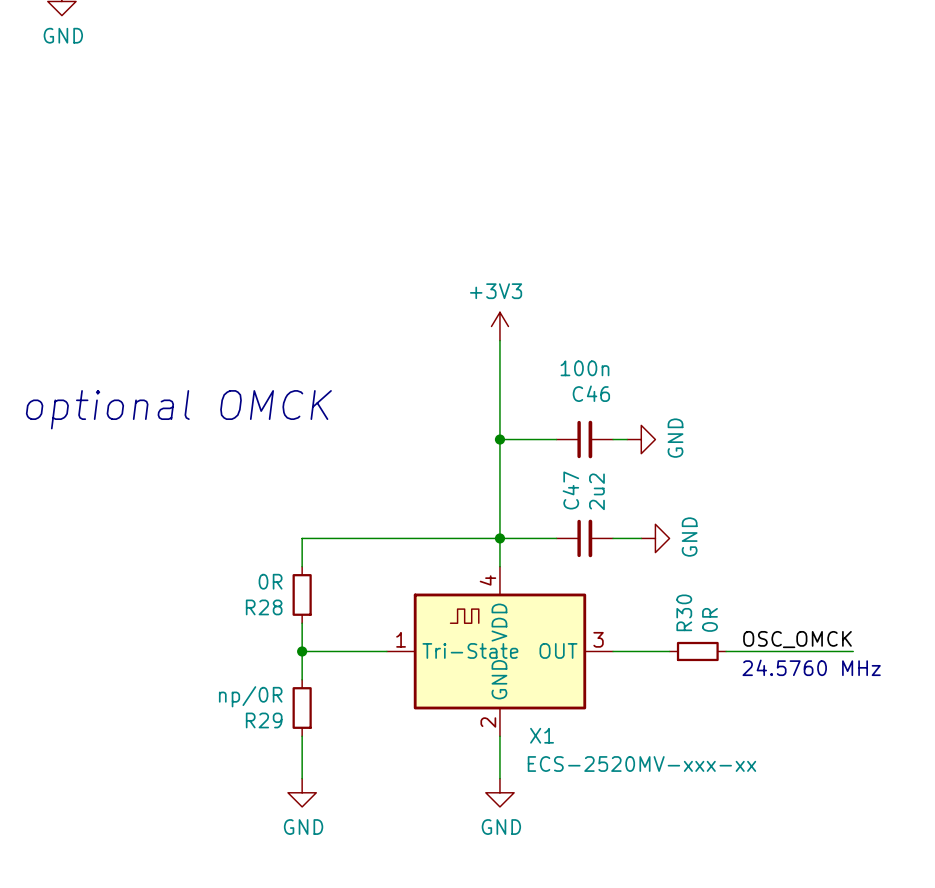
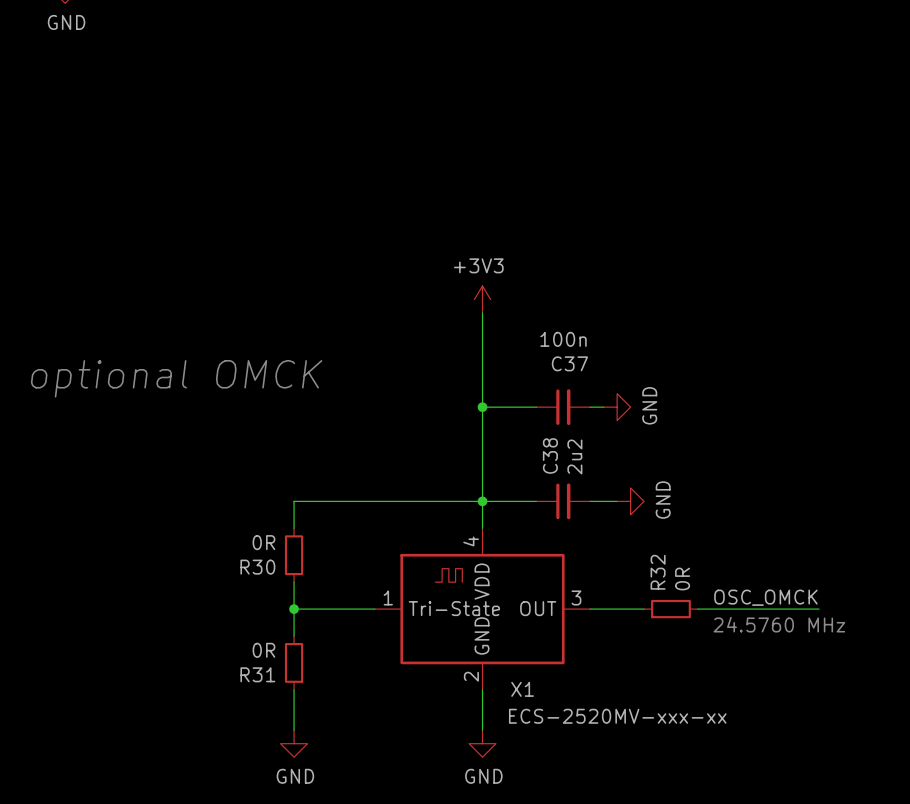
C46 name: C46 (591, 393) -> C37 (569, 363)
C47 name: C47 (570, 490) -> C38 (550, 456)
R28 name: R28 (264, 607) -> R30 (257, 567)
R30 name: R30 (684, 612) -> R32 (658, 572)
R29 value: np/0R (250, 696) -> 0R (263, 650)
R29 name: R29 (264, 720) -> R31 (257, 674)

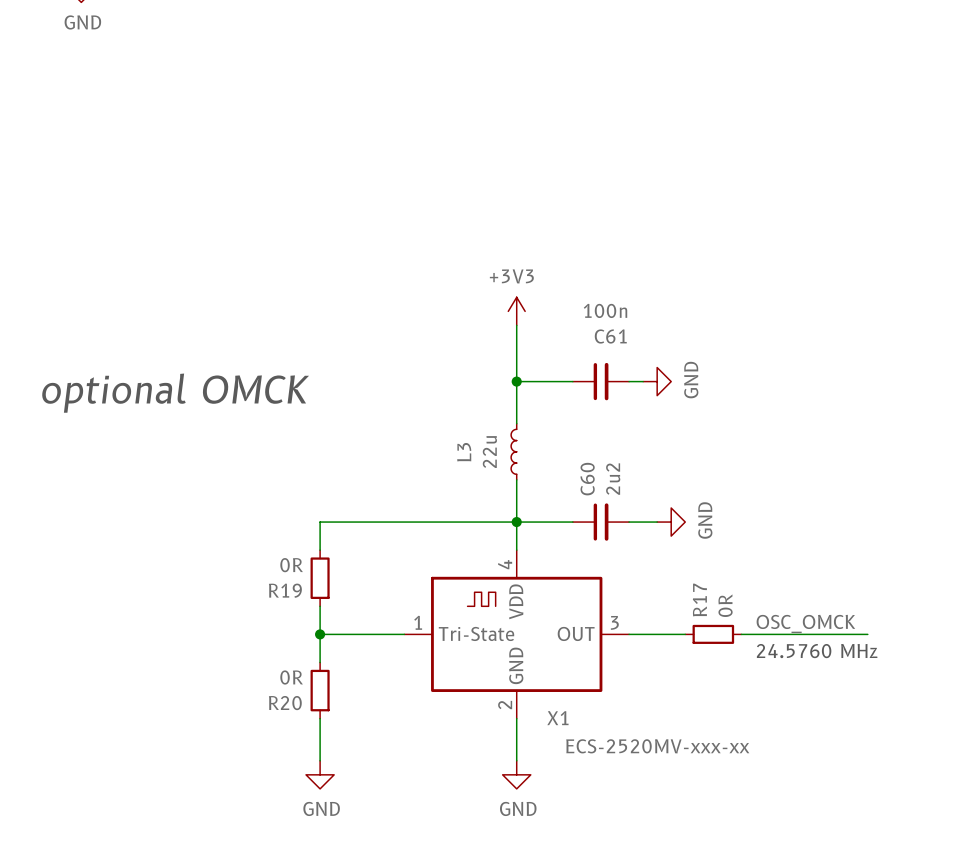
wire: none -> (516, 381) (572, 381)
C61: none -> 100n (600, 381)
junction position: (482, 407) -> (516, 381)
wire: (536, 407) (482, 407) (482, 461) -> none
C37: 100n (563, 407) -> none
wire: (590, 407) (603, 407) -> (629, 381) (643, 381)
power symbol position: GND (617, 407) -> GND (657, 381)
L3: none -> 22u (513, 451)
C38 name: C38 (550, 456) -> C60 (587, 479)
R30 name: R30 (257, 567) -> R19 (285, 590)
R32 name: R32 (658, 572) -> R17 (699, 600)
R31 name: R31 (257, 674) -> R20 (285, 703)

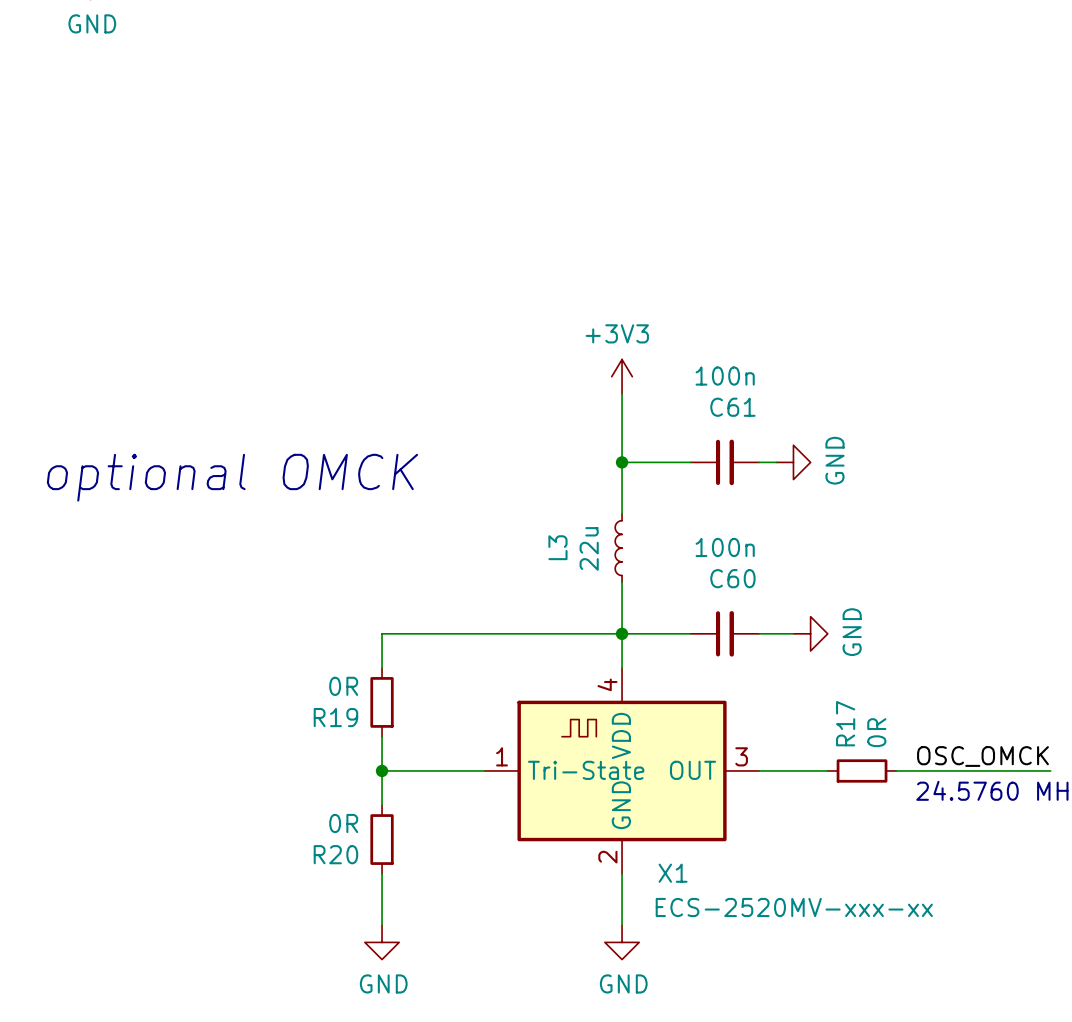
C60 name rotation: 0° (587, 479) -> 90° clockwise (732, 578)
C60 value: 2u2 (613, 479) -> 100n (725, 547)

